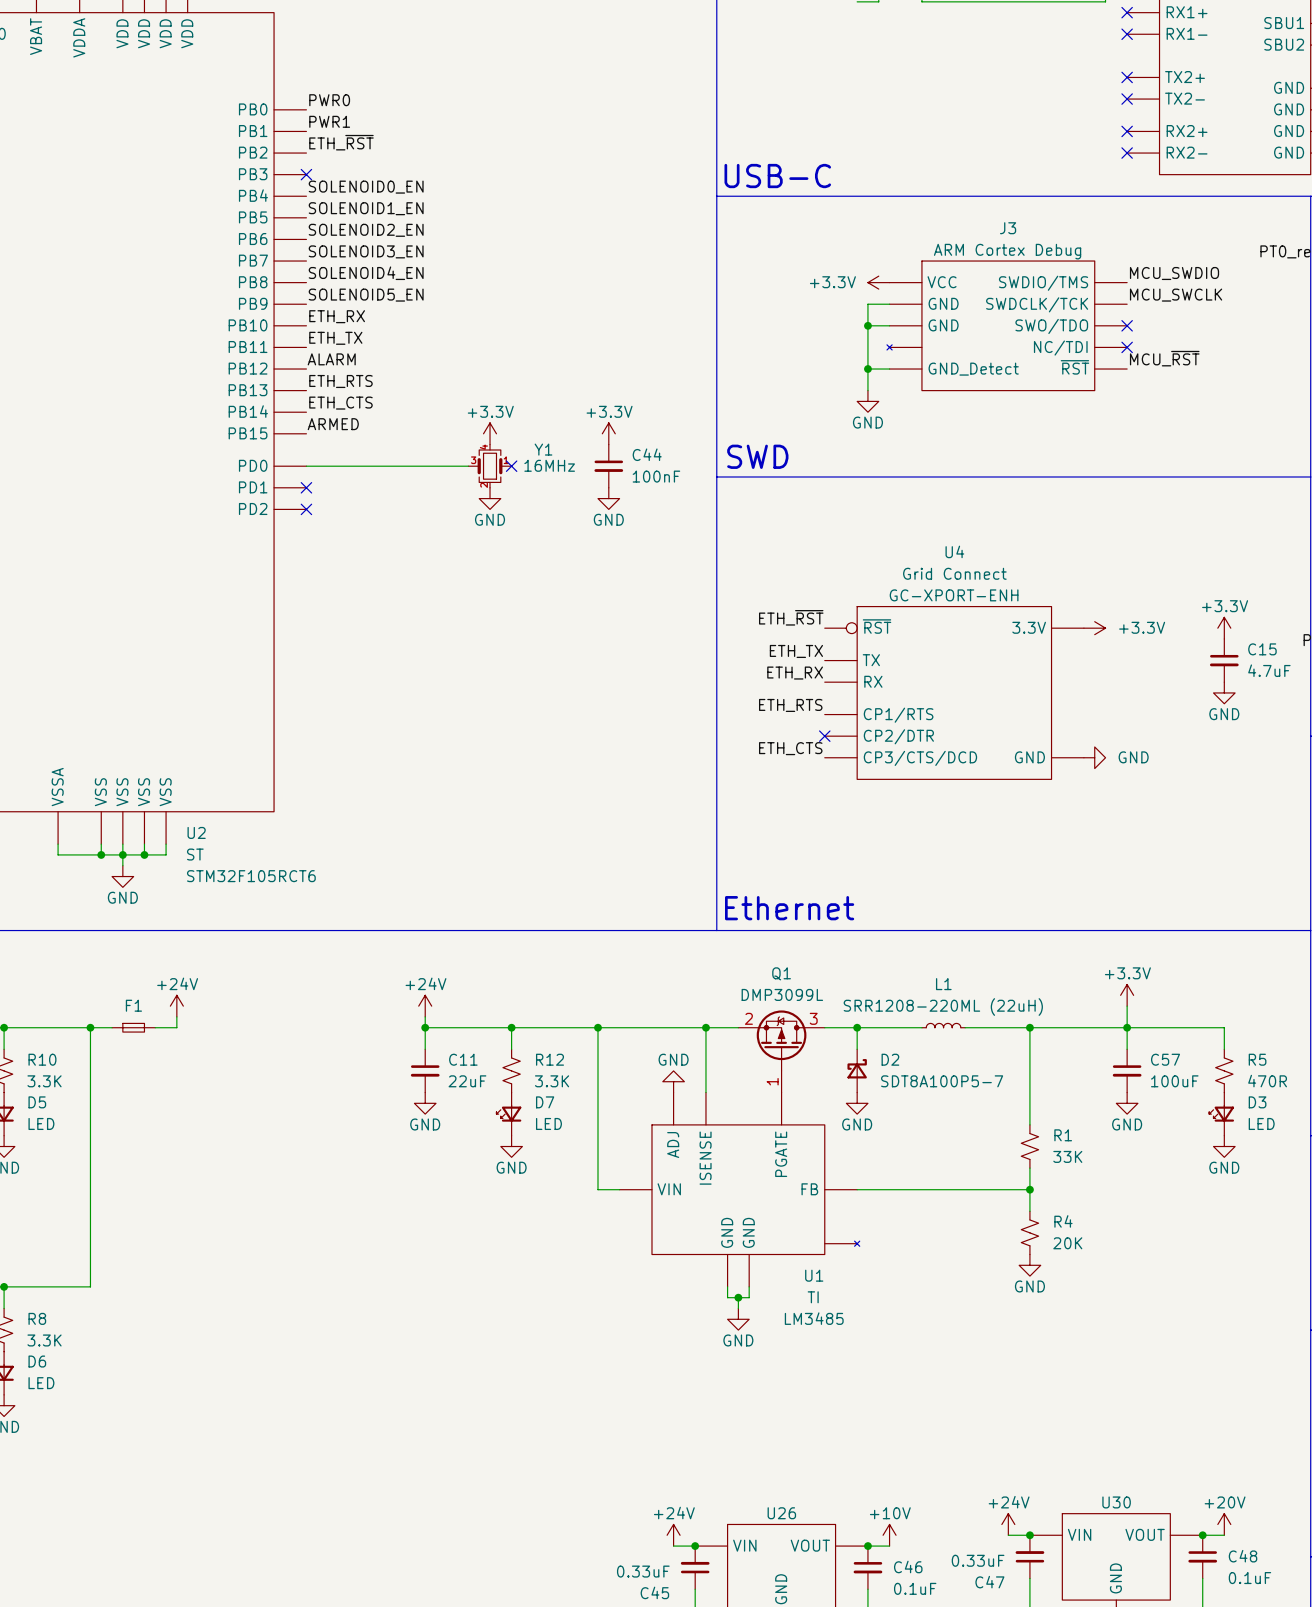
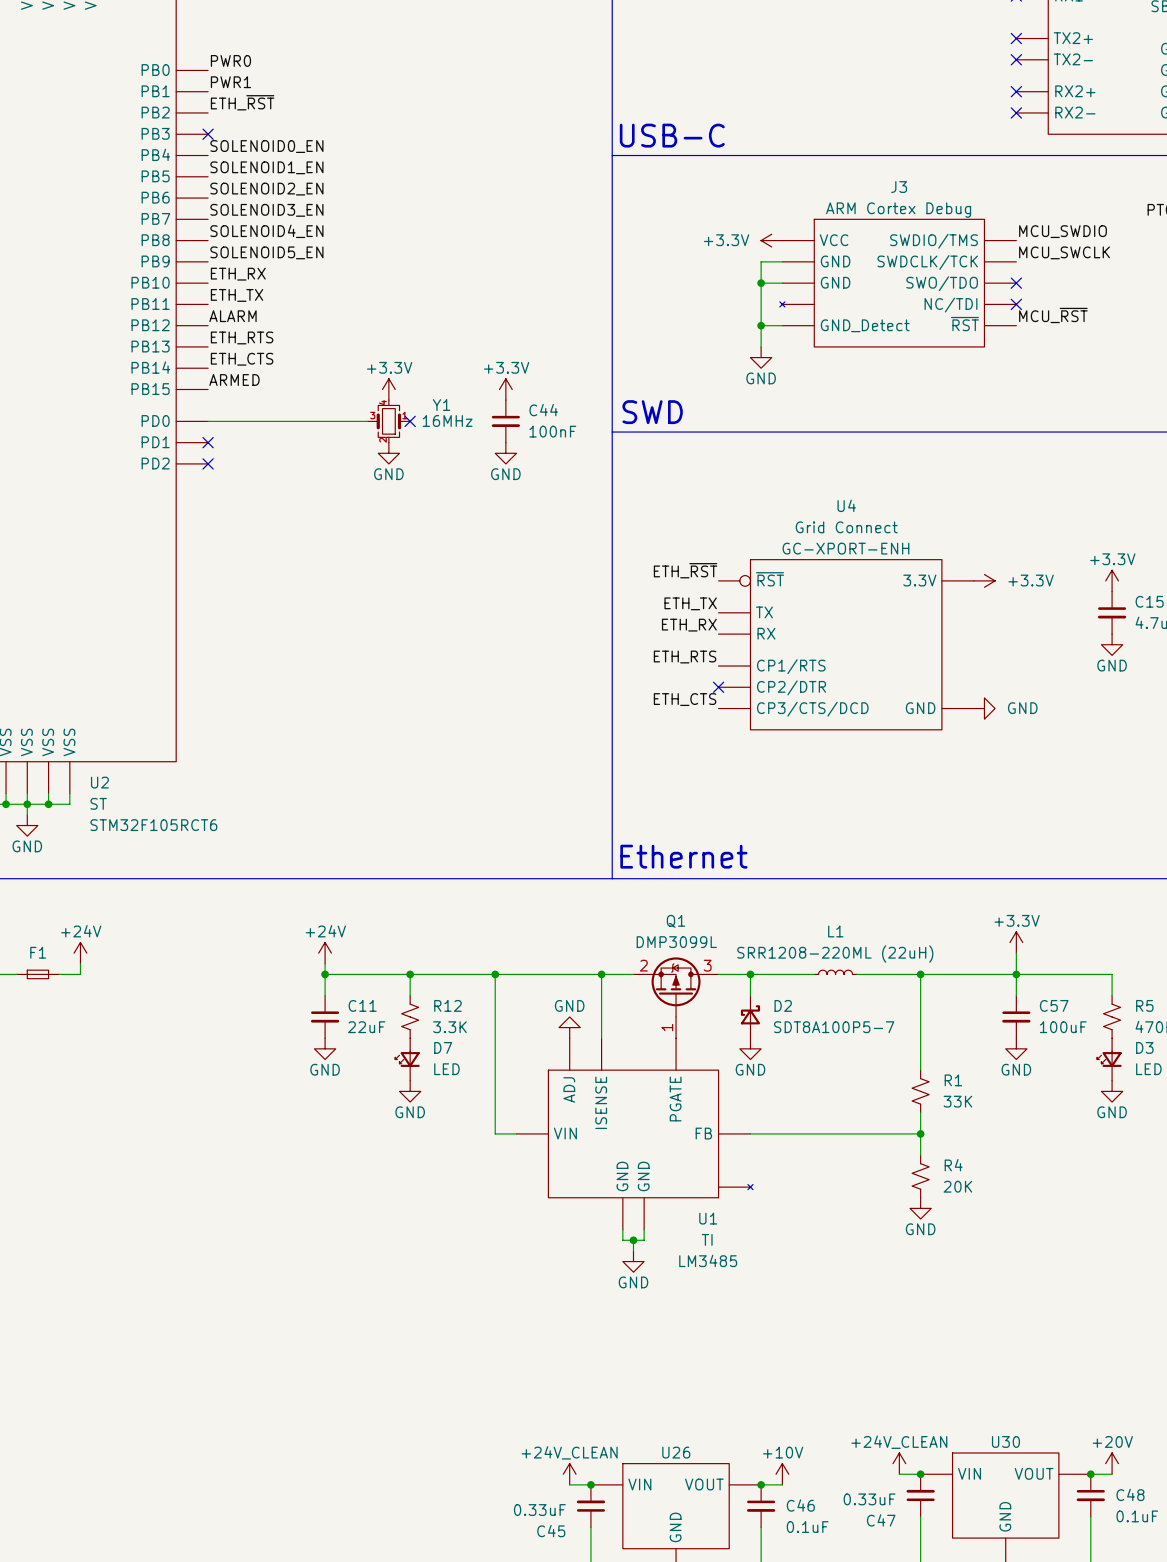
power symbol: +24V (1008, 1524) -> +24V_CLEAN (899, 1463)
power symbol: +24V (673, 1535) -> +24V_CLEAN (569, 1474)

